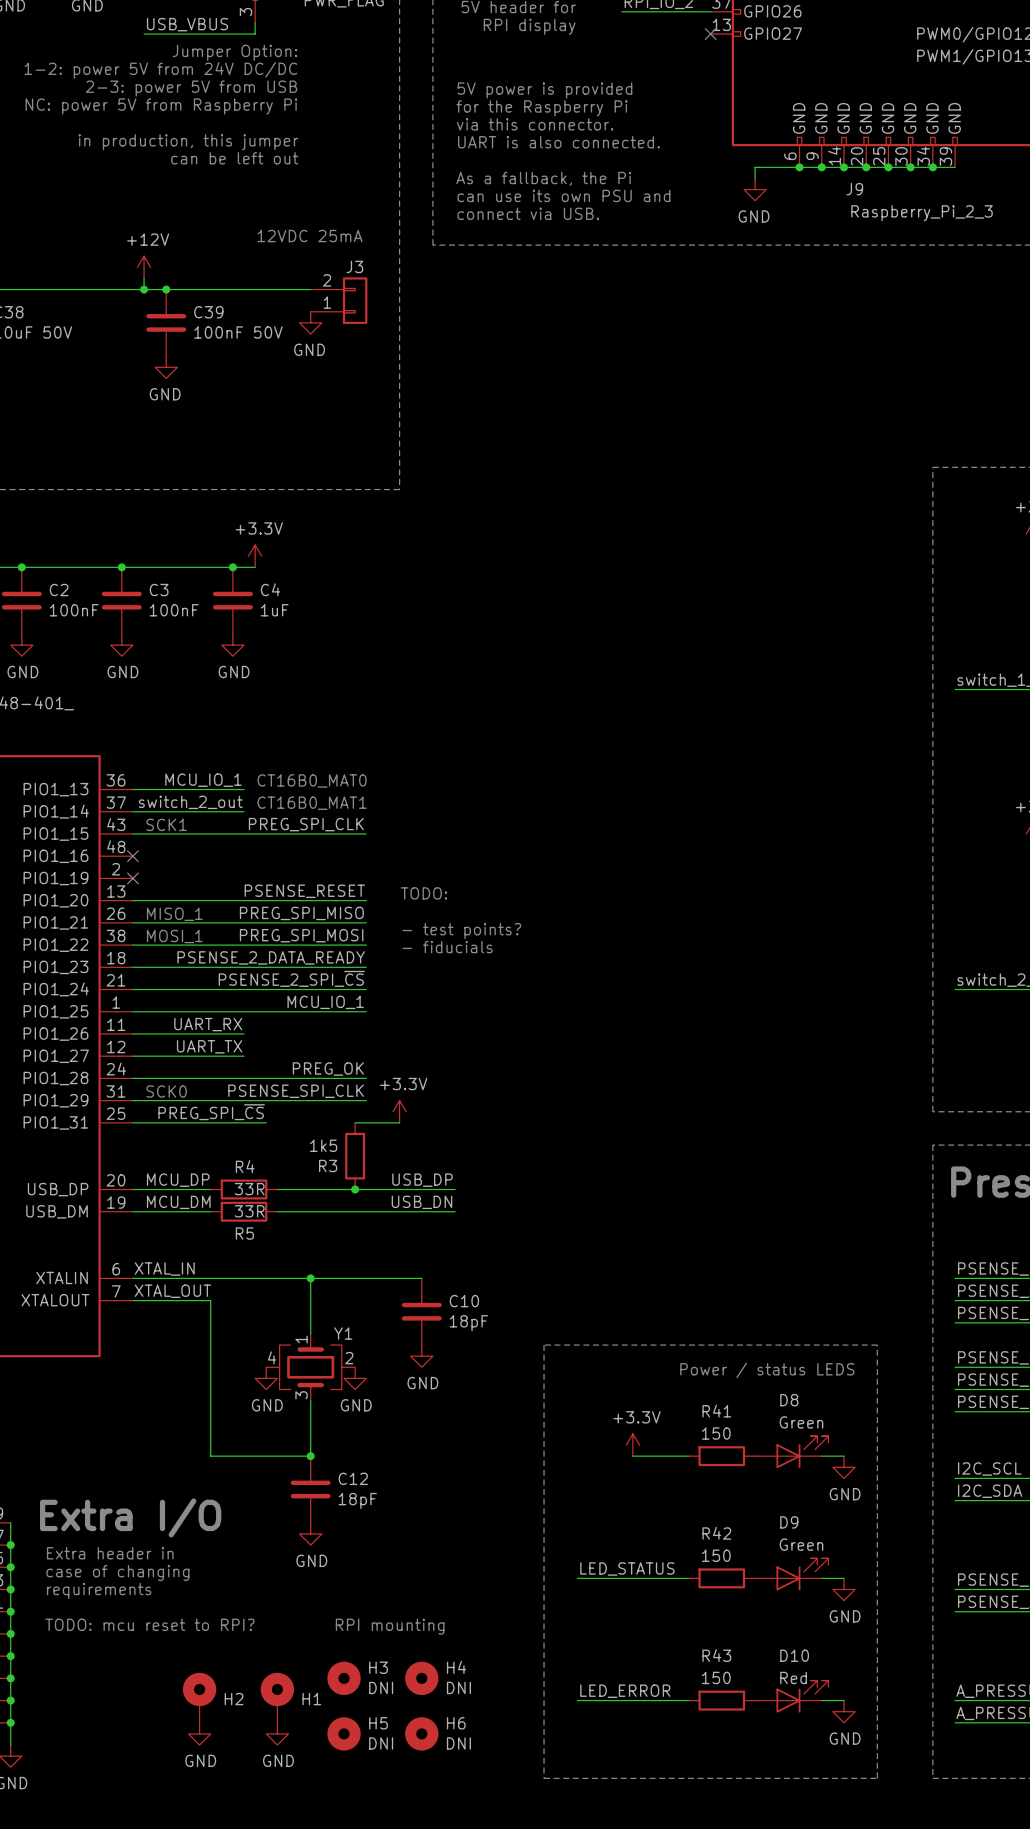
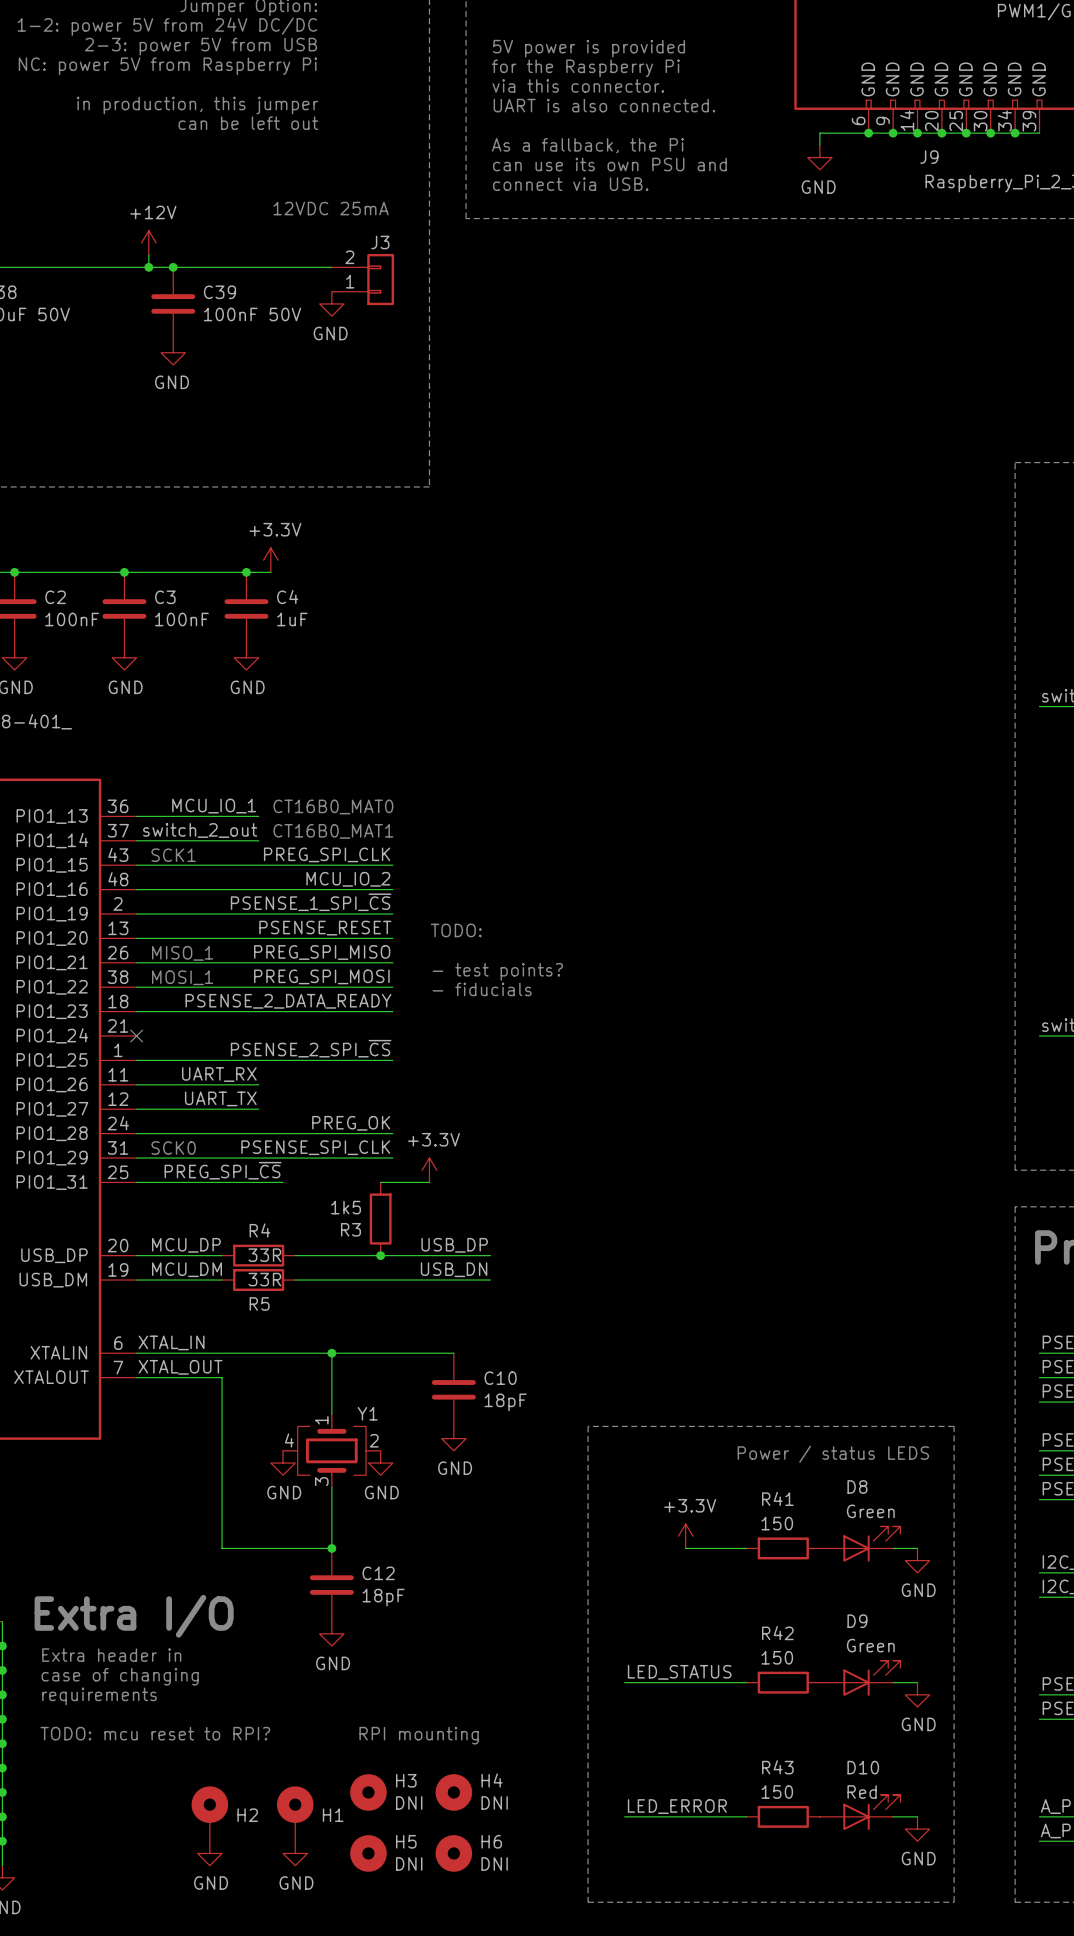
label: none -> MCU_IO_2 (348, 879)
wire: none -> (136, 889) (392, 889)
no-connect mark: (132, 856) -> none
label: none -> PSENSE_1_SPI_~{CS} (311, 902)
no-connect mark: (132, 878) -> none
label: PSENSE_2_SPI_~{CS} (291, 978) -> none
wire: (132, 989) (366, 989) -> (136, 914) (392, 914)
no-connect mark: none -> (136, 1036)
label: MCU_IO_1 (325, 1002) -> PSENSE_2_SPI_~{CS} (311, 1048)

